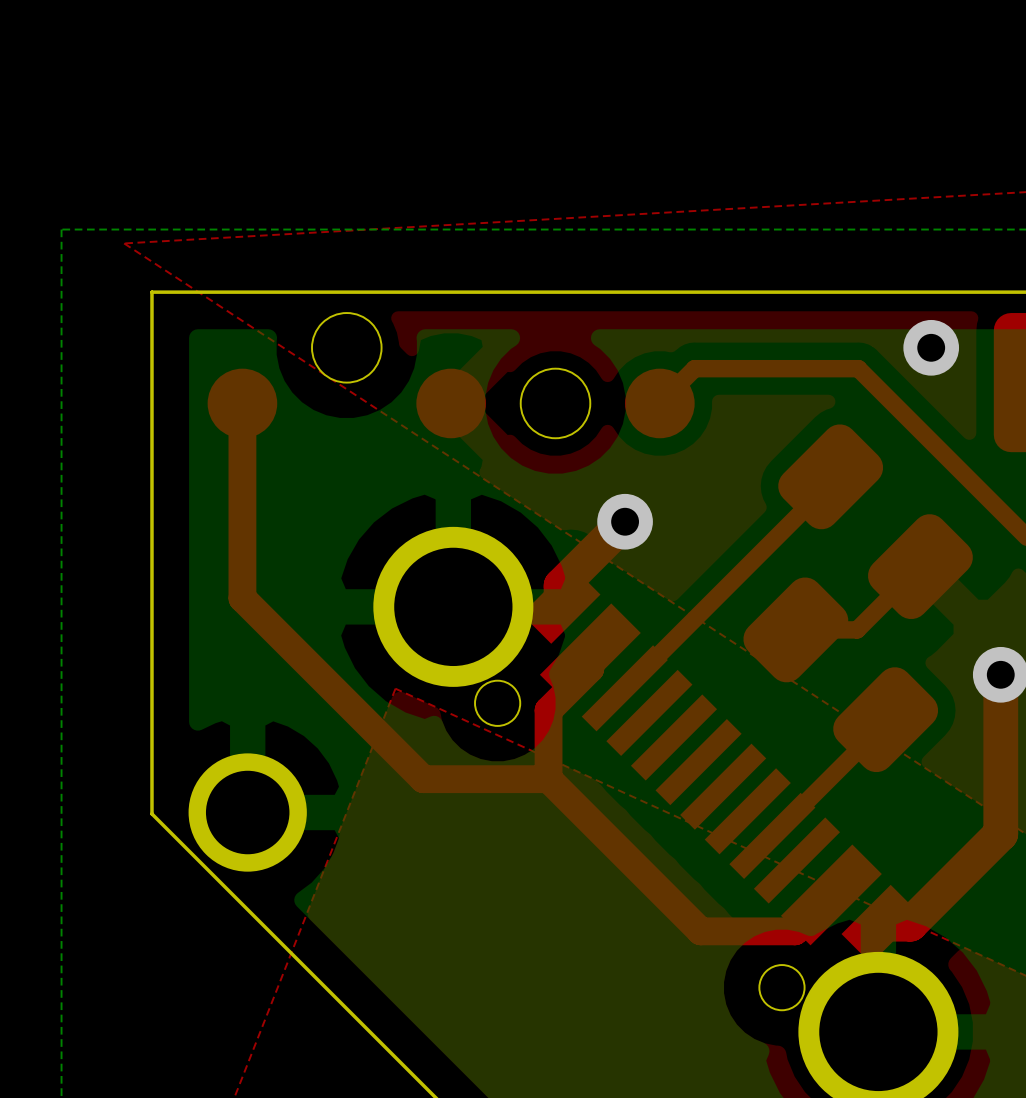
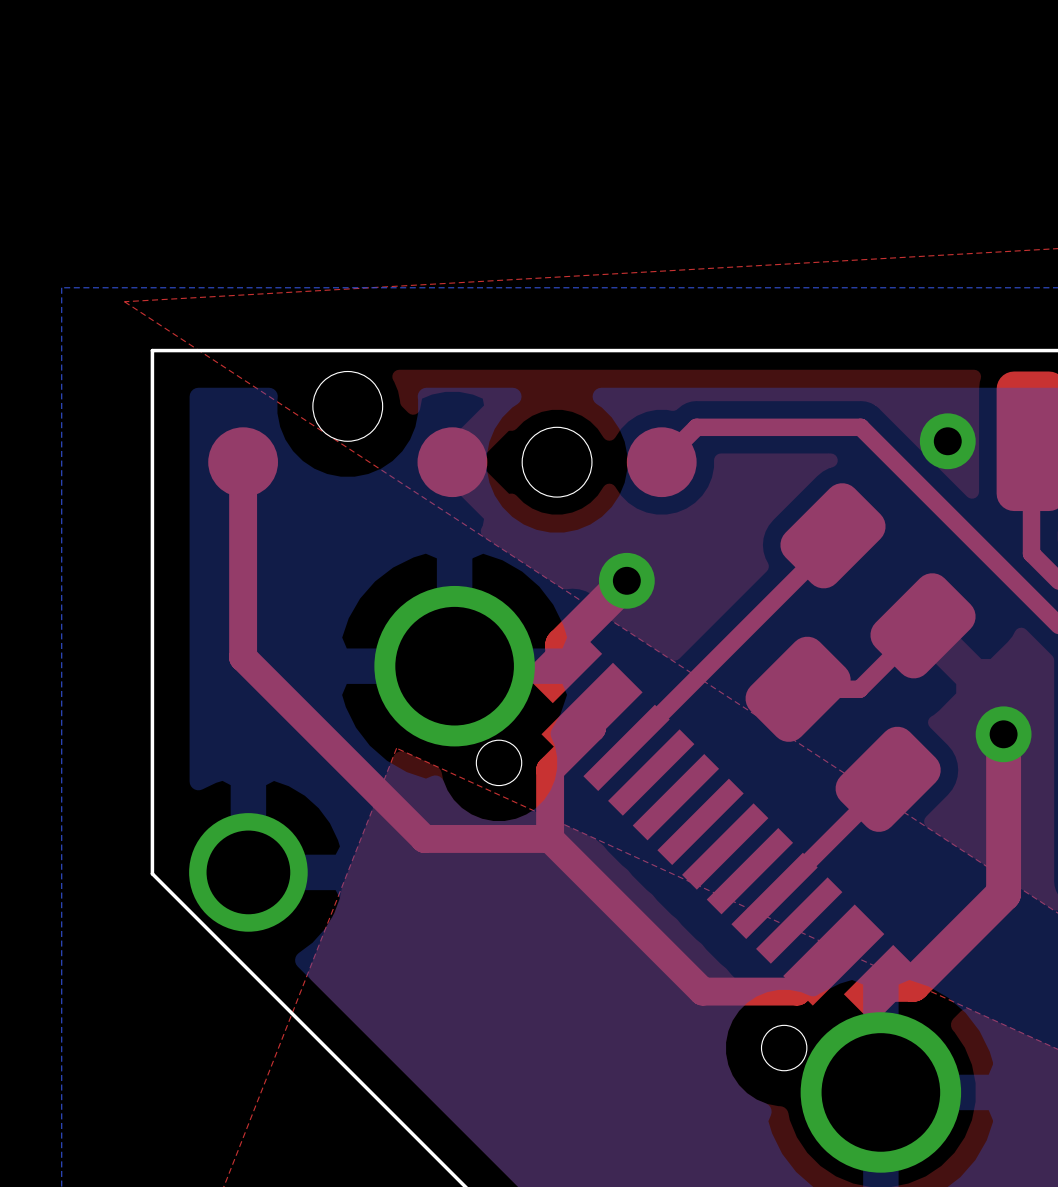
via position: (931, 347) -> (947, 441)

